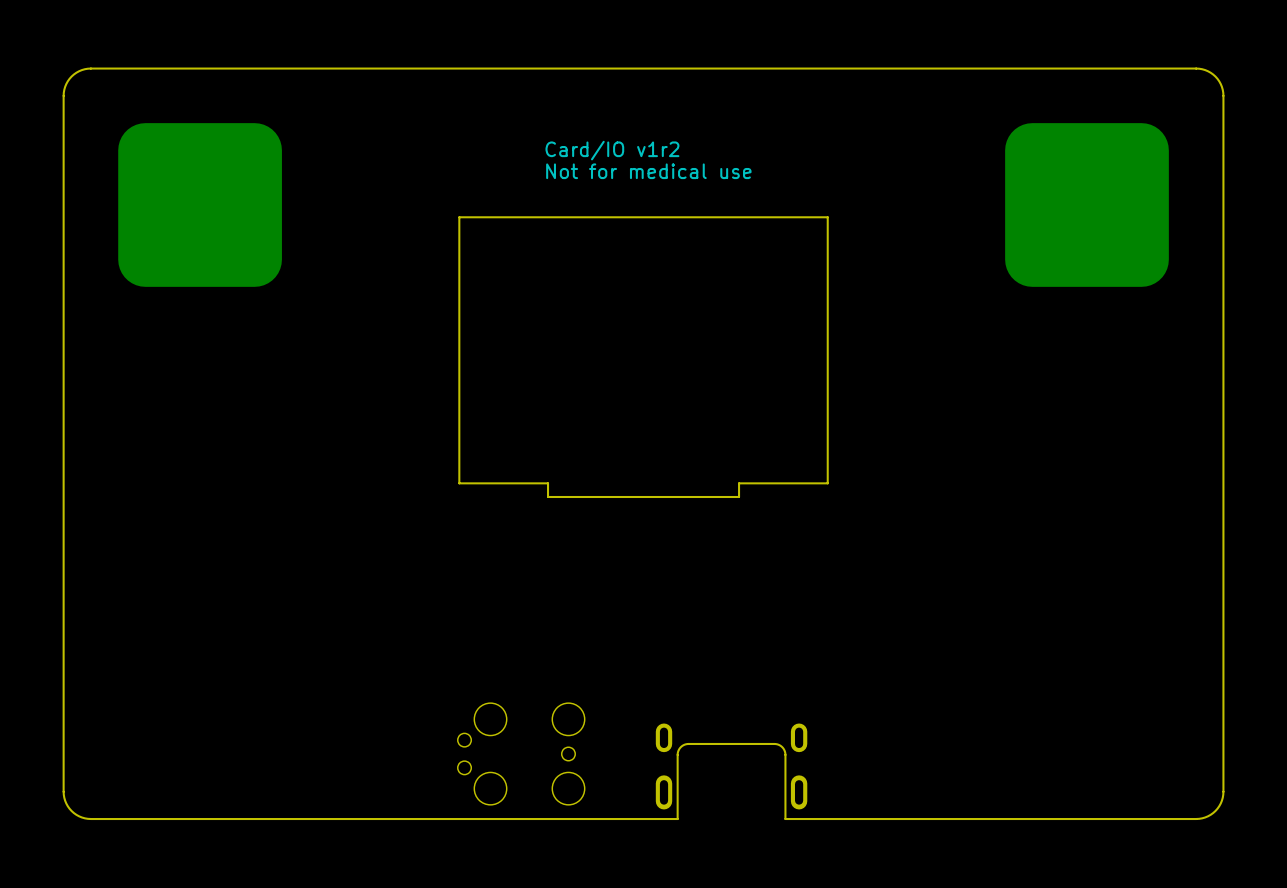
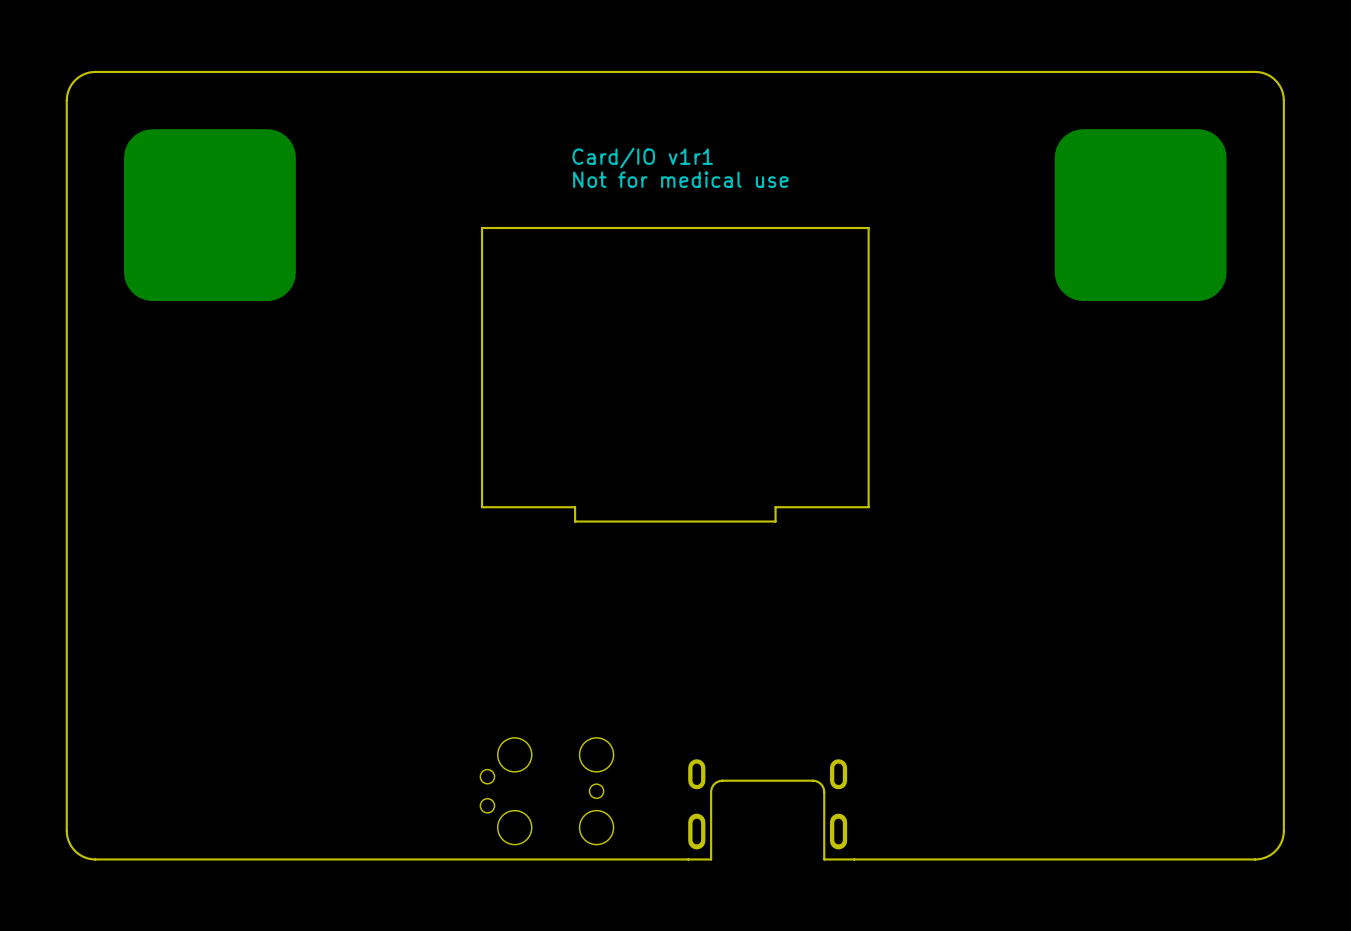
text: Card/IO v1r2 (612, 150) -> Card/IO v1r1 (642, 158)

